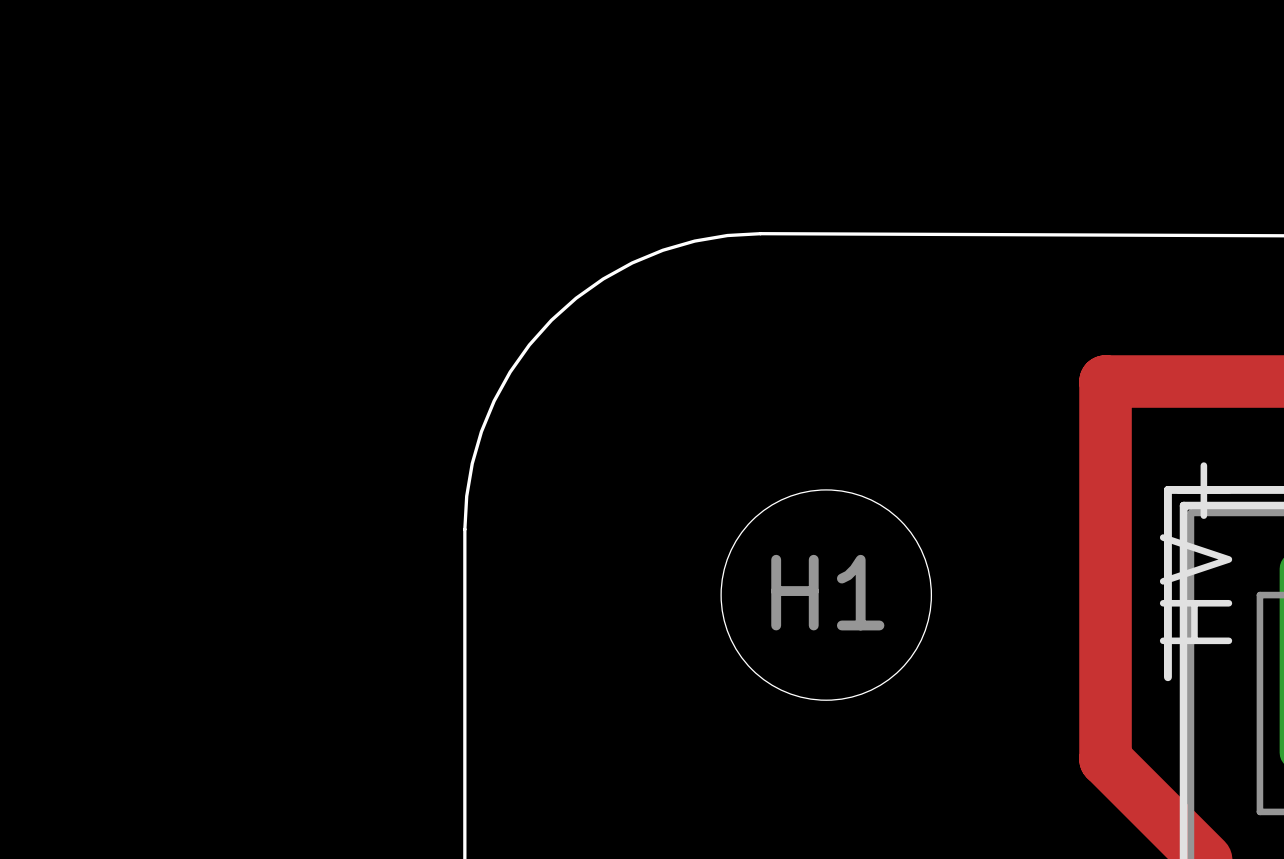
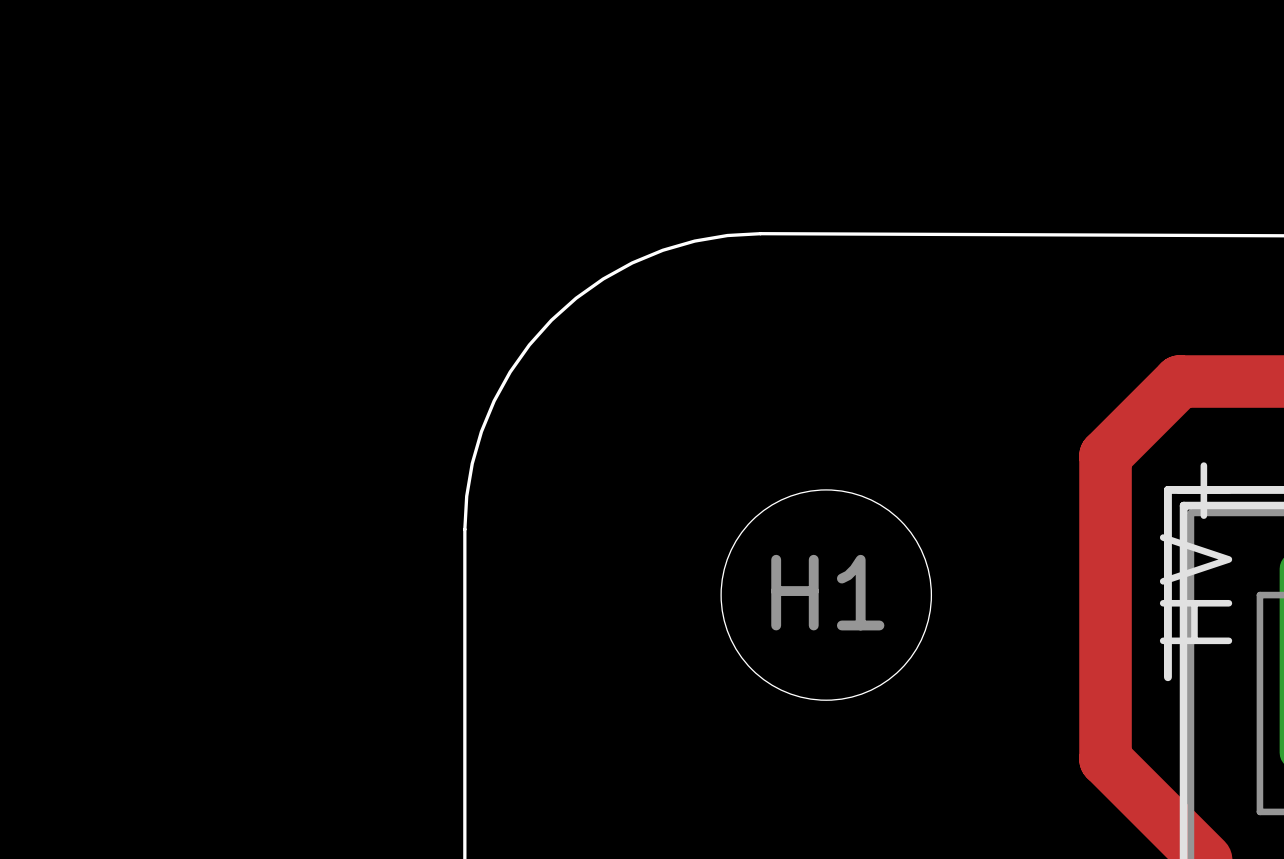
top track: (1179, 381) (1105, 381) (1105, 455) -> (1179, 381) (1105, 455)

